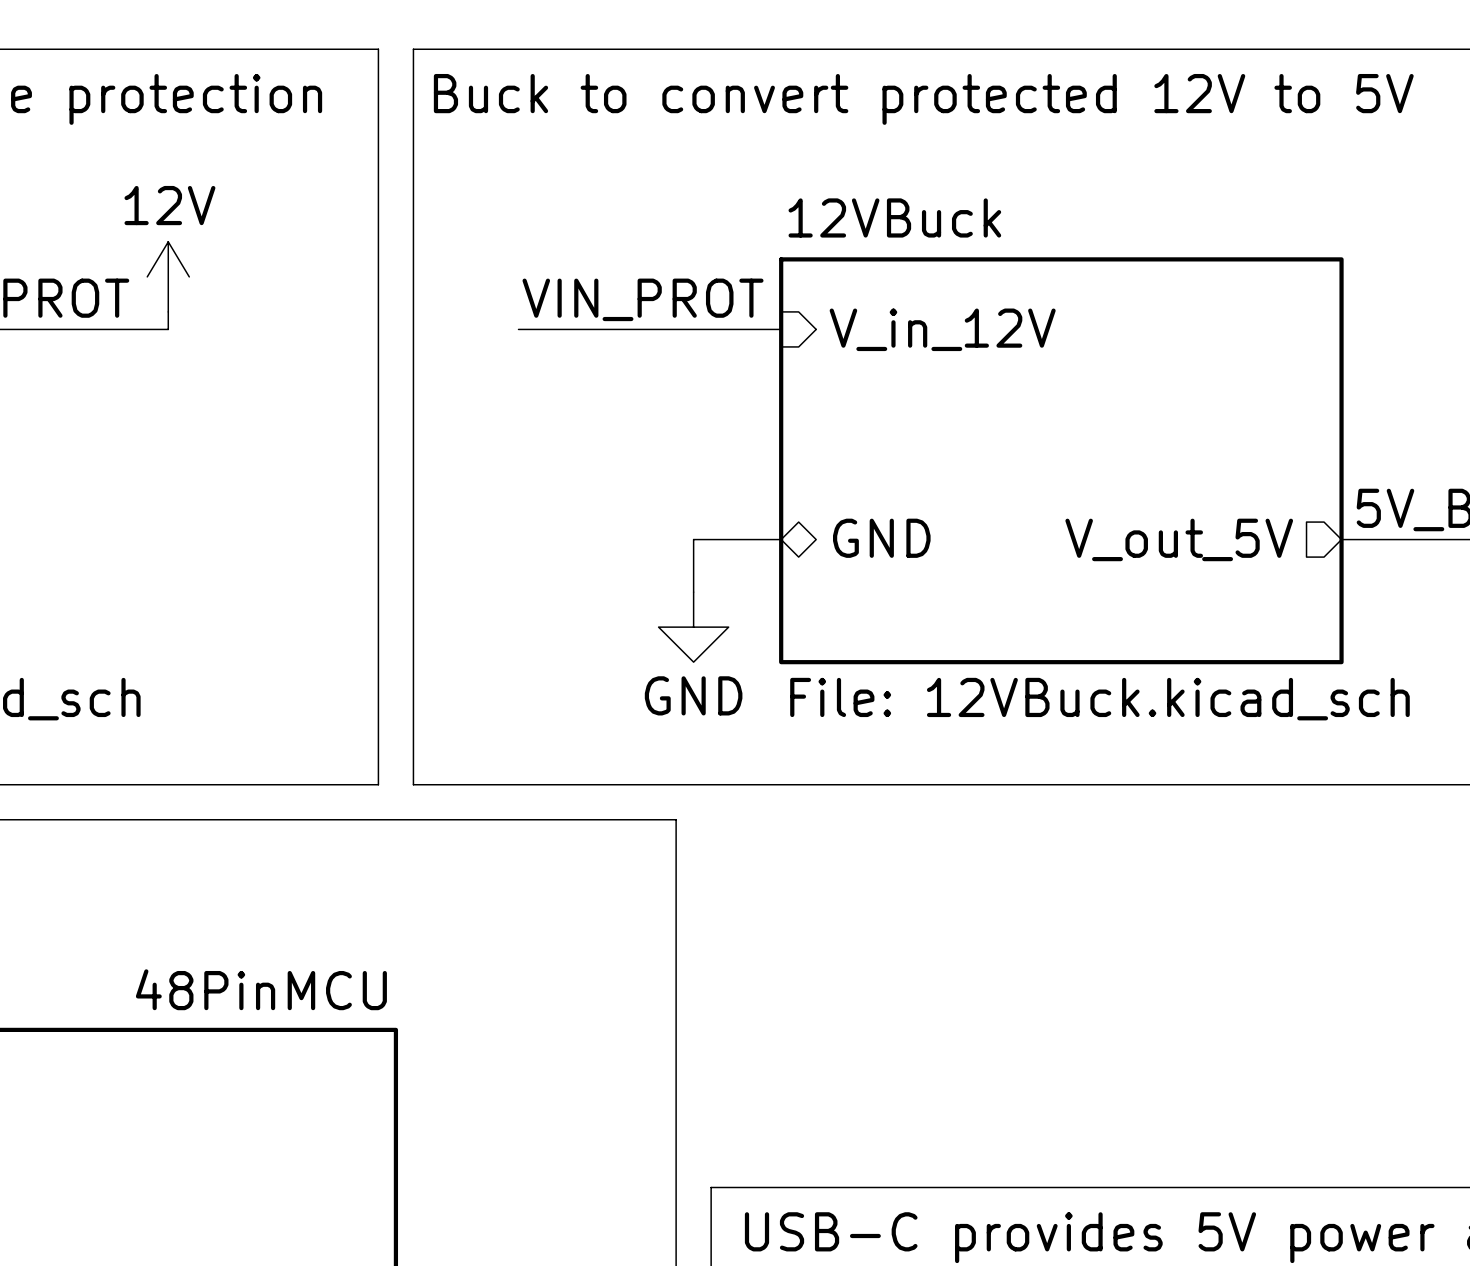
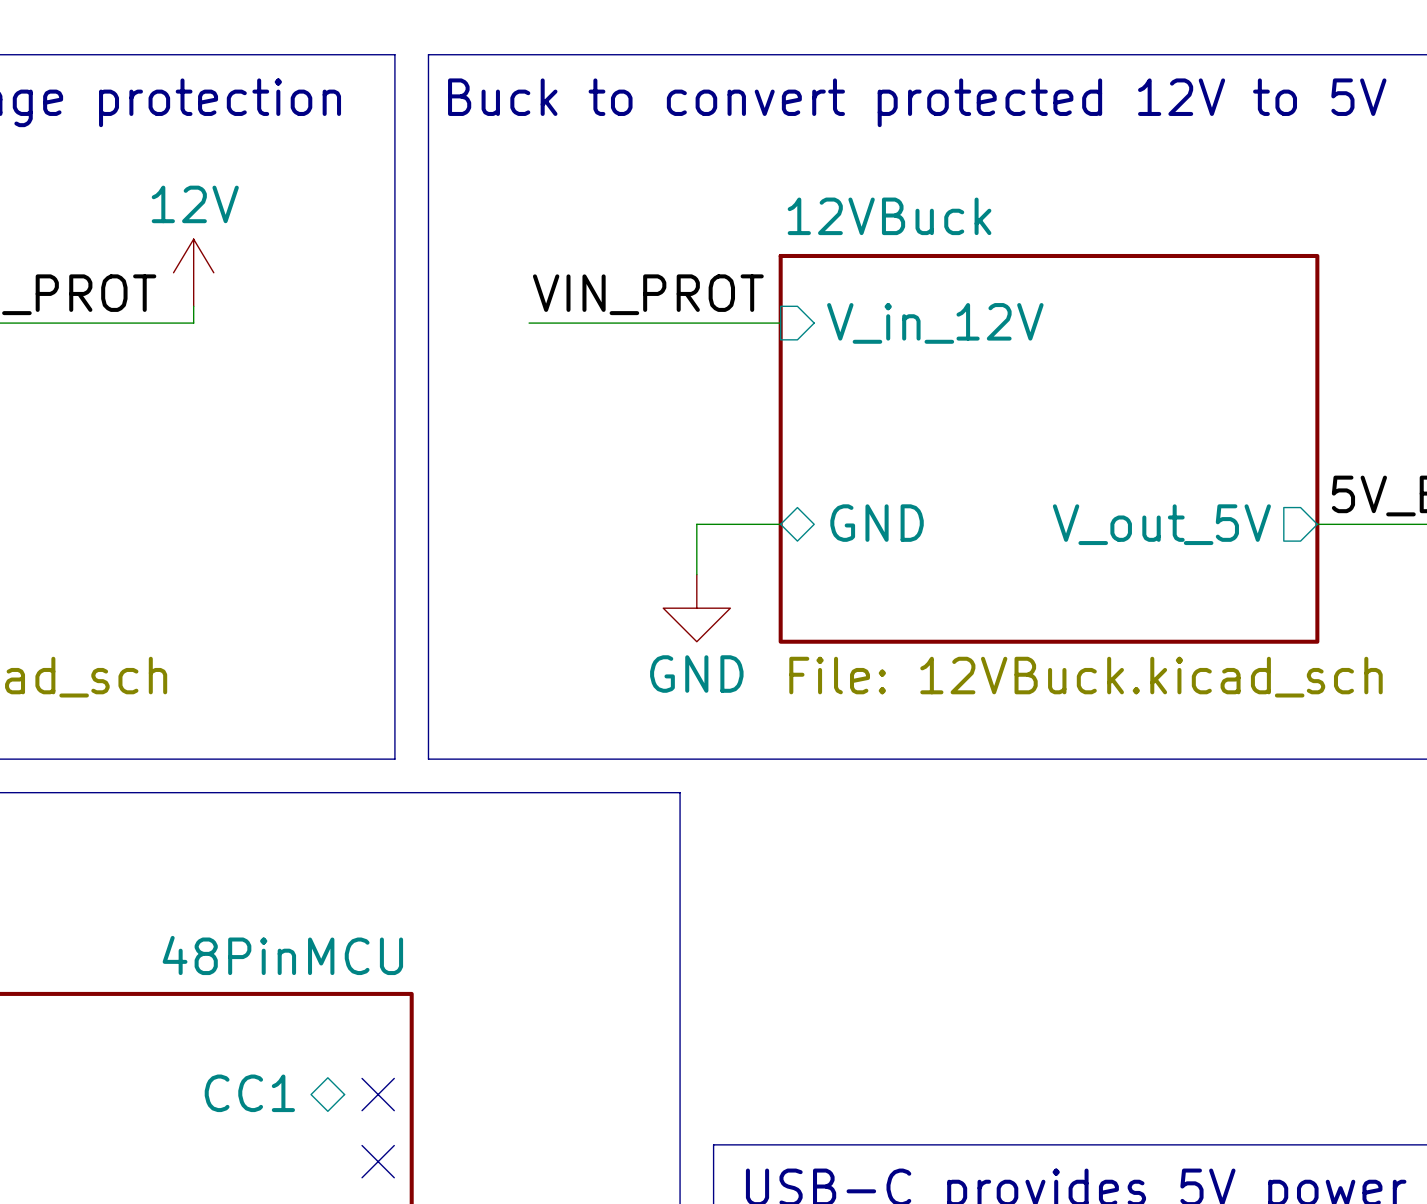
sheet pin: none -> CC1 (249, 1093)
no-connect mark: none -> (378, 1094)
no-connect mark: none -> (378, 1161)

